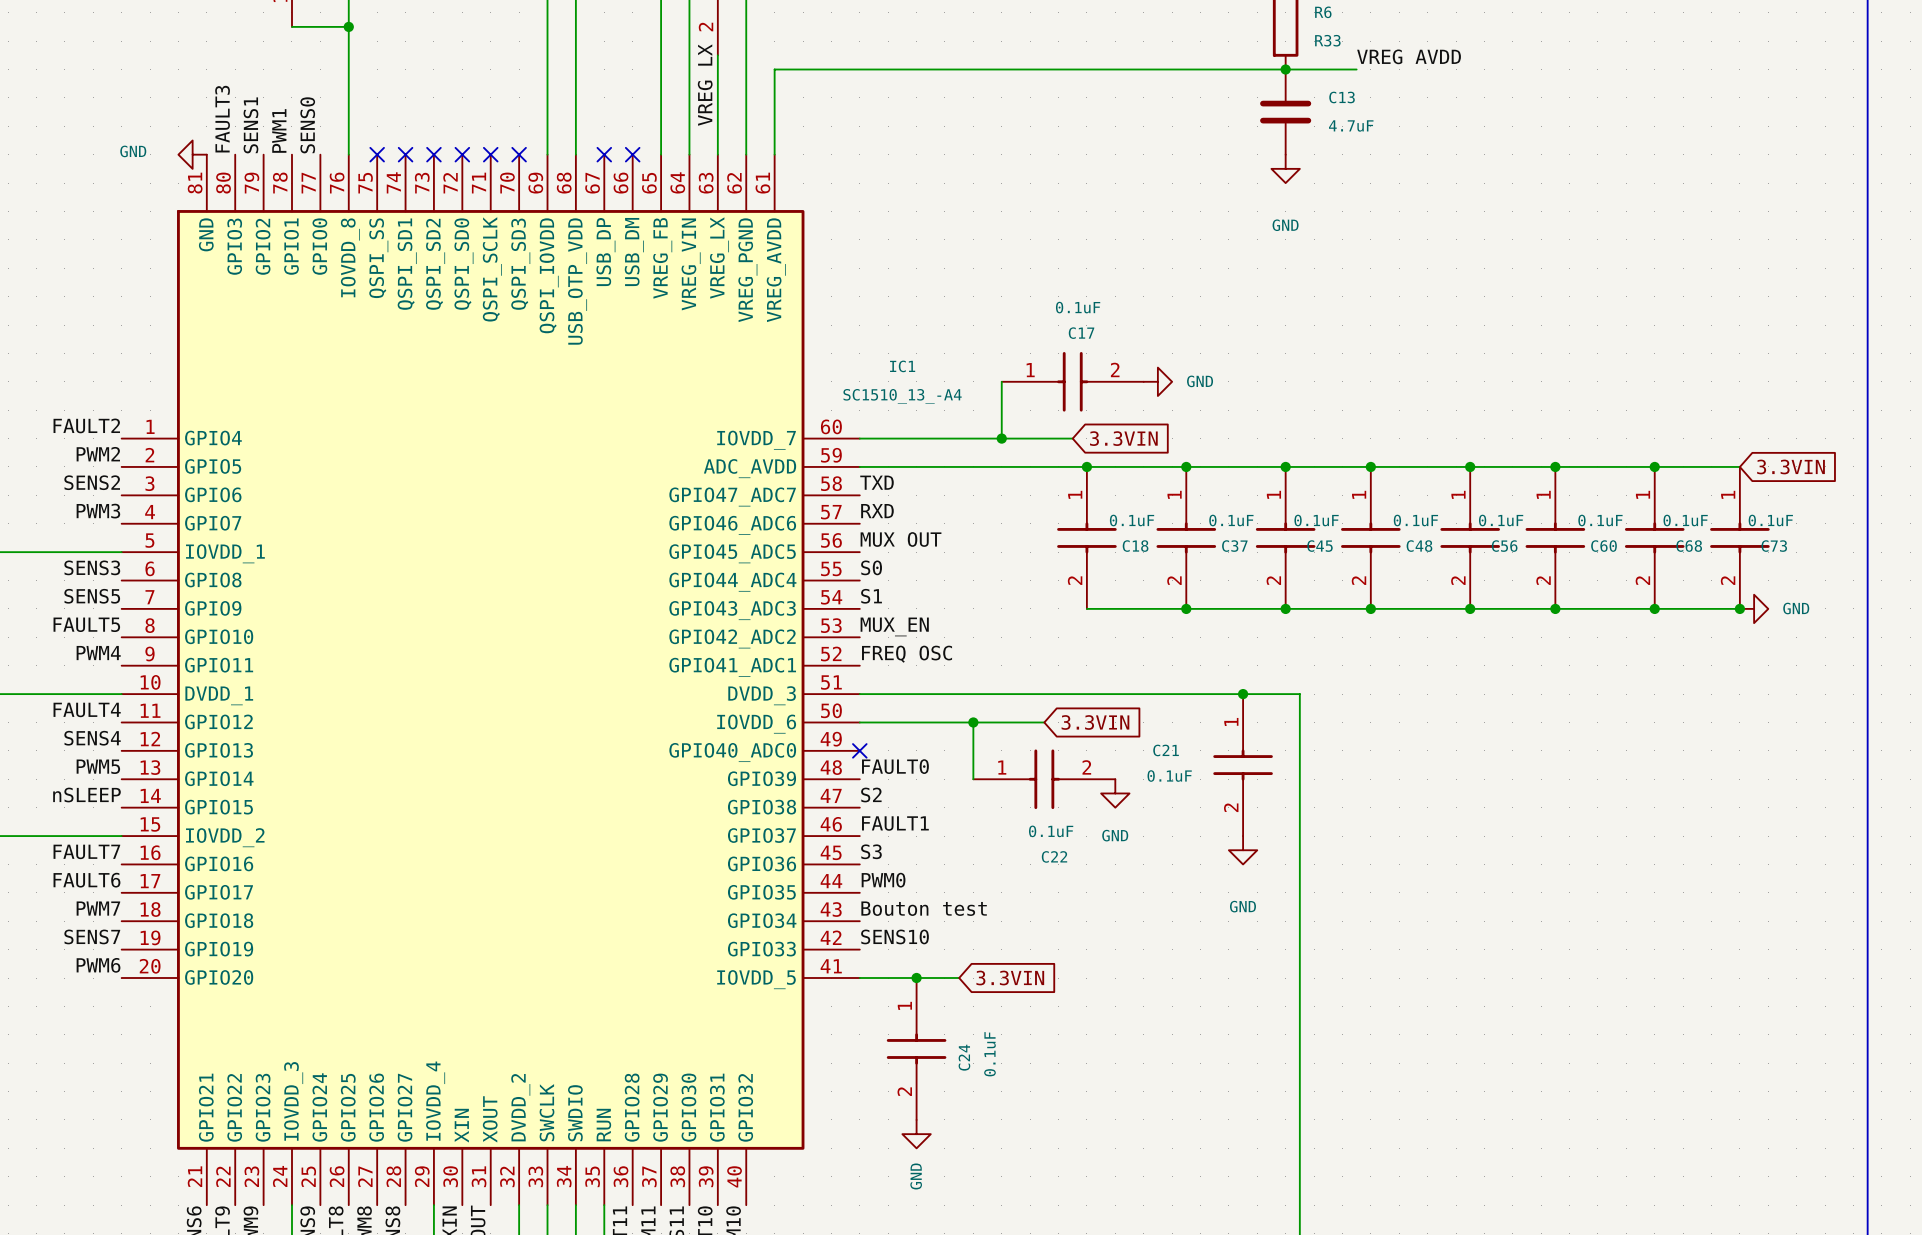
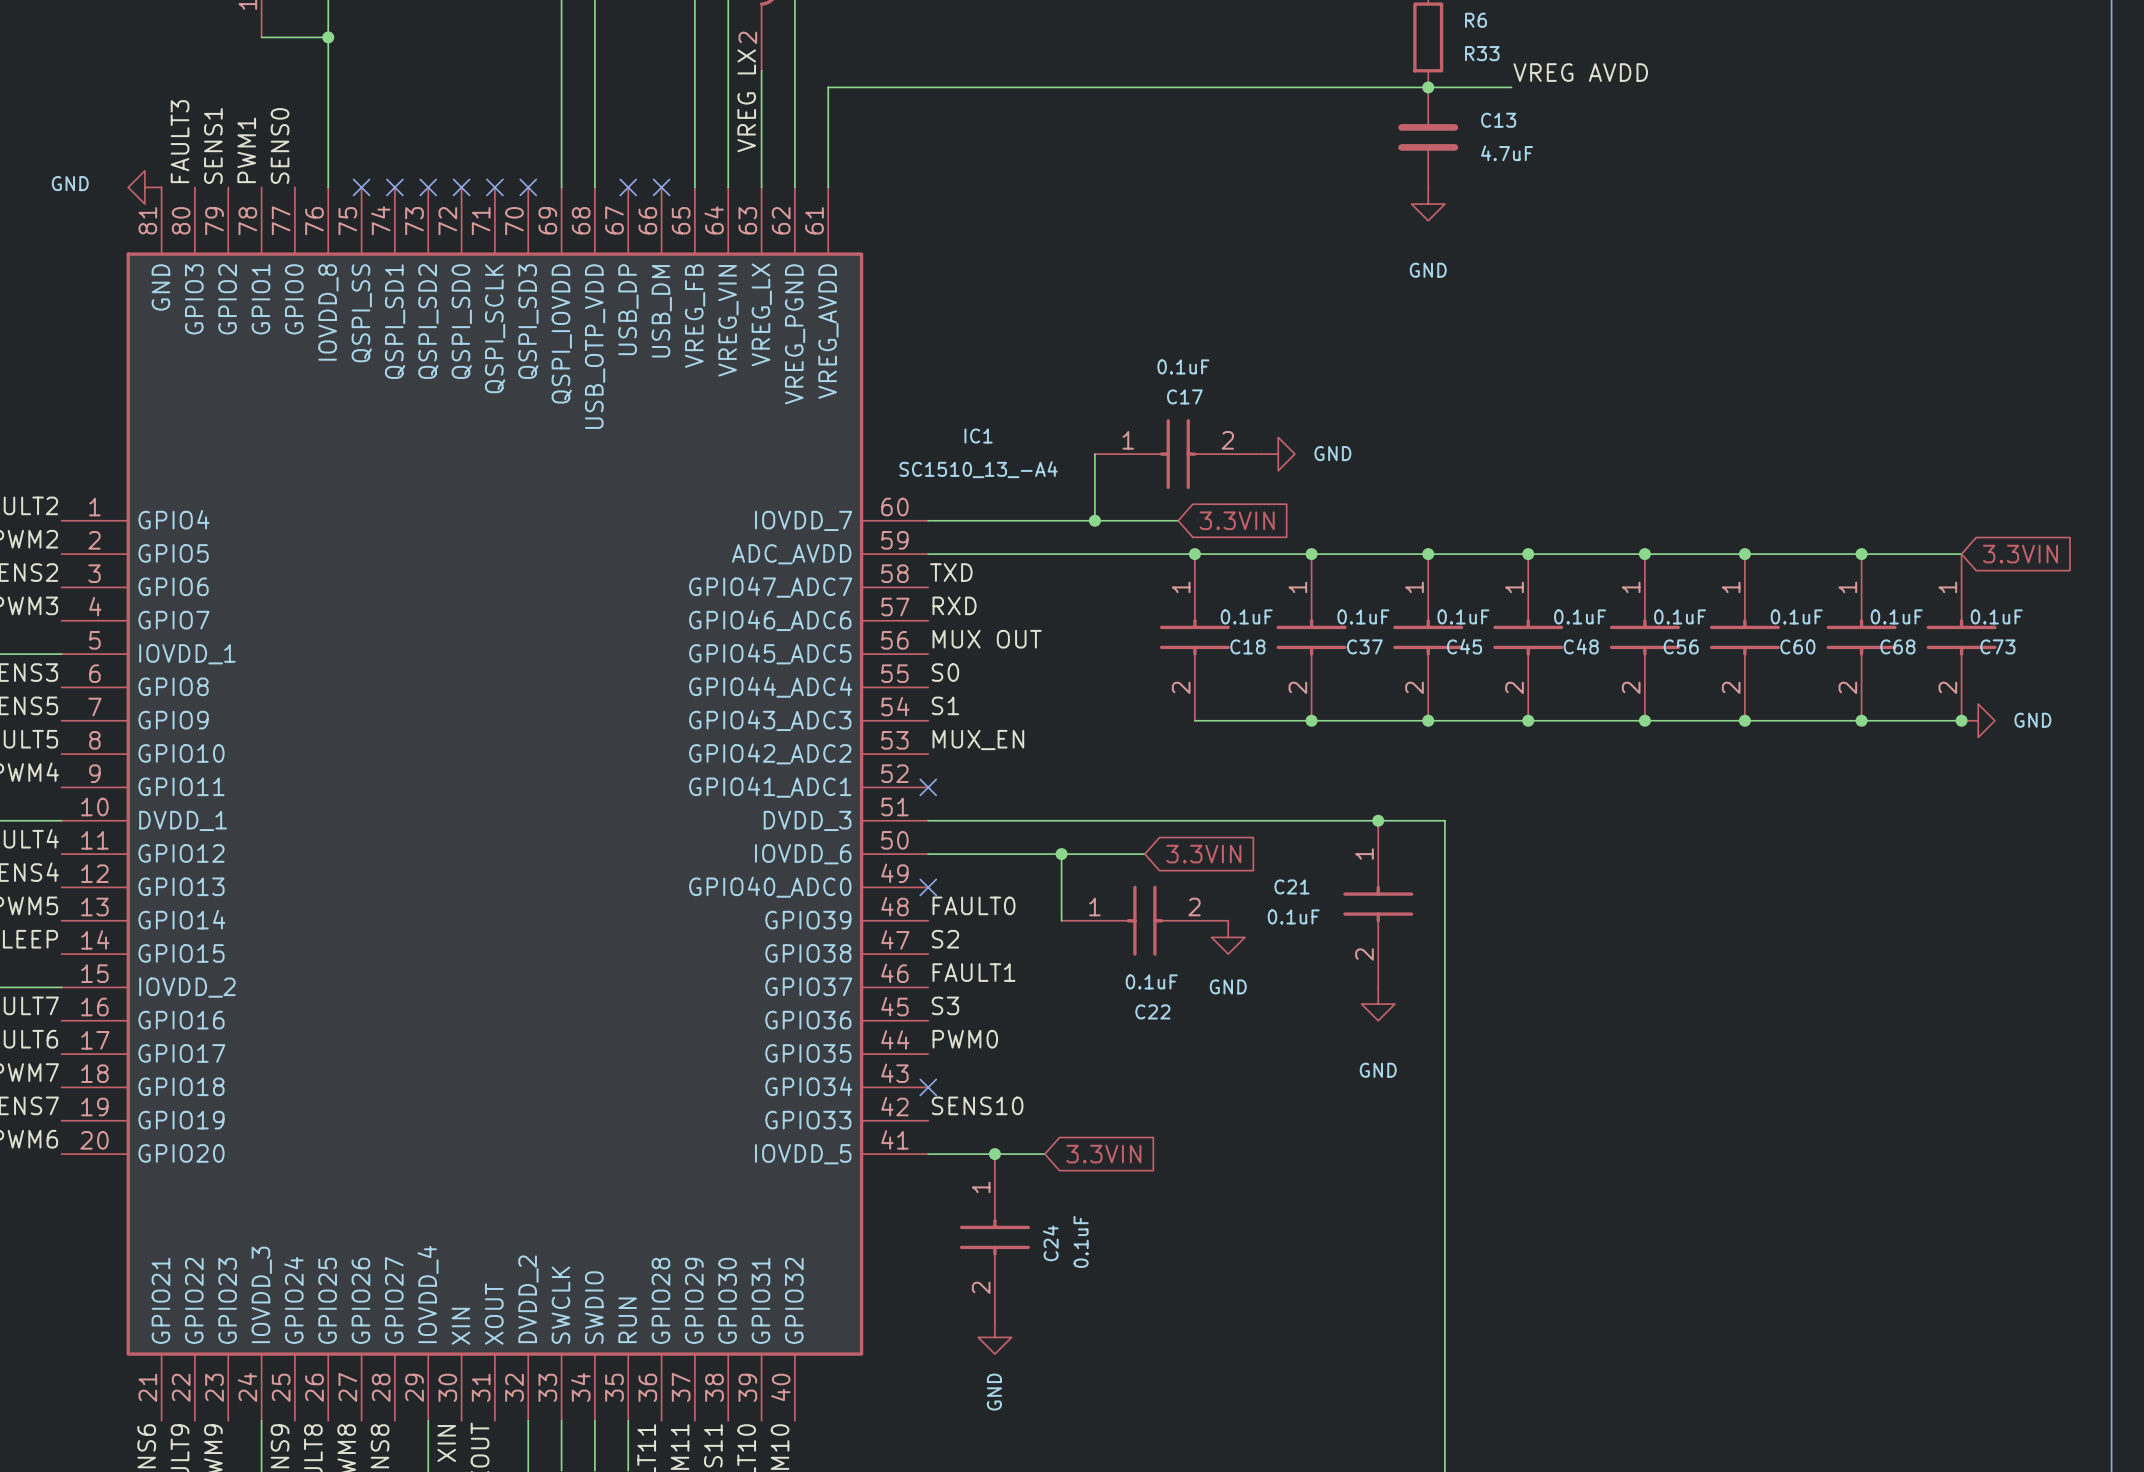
label: FREQ OSC (907, 654) -> none
no-connect mark: none -> (928, 787)
label: Bouton test (924, 908) -> none
no-connect mark: none -> (928, 1087)

